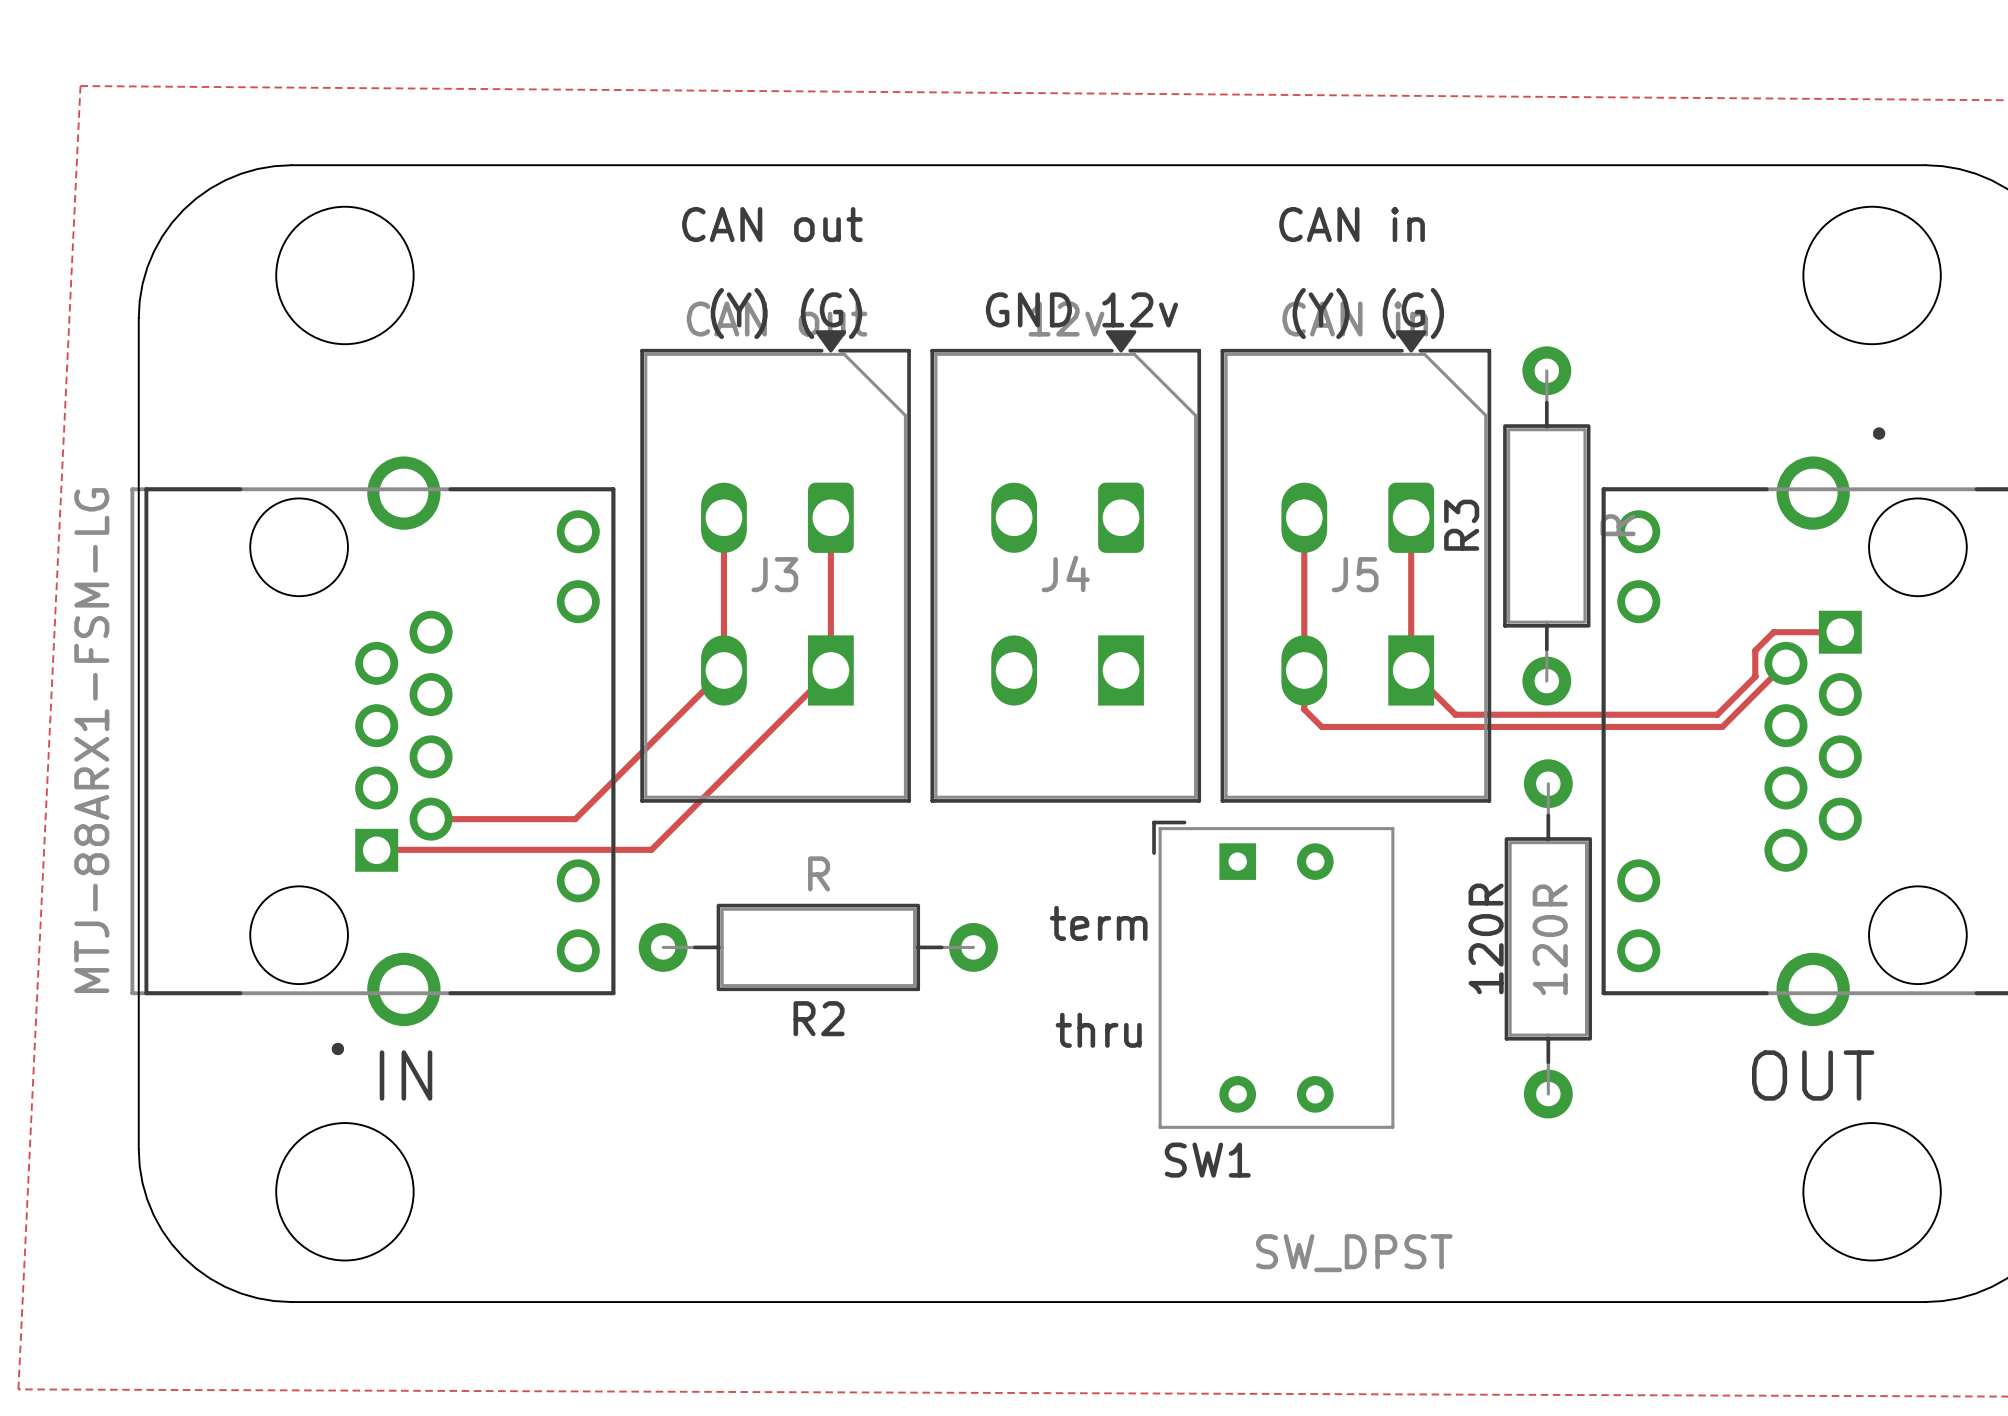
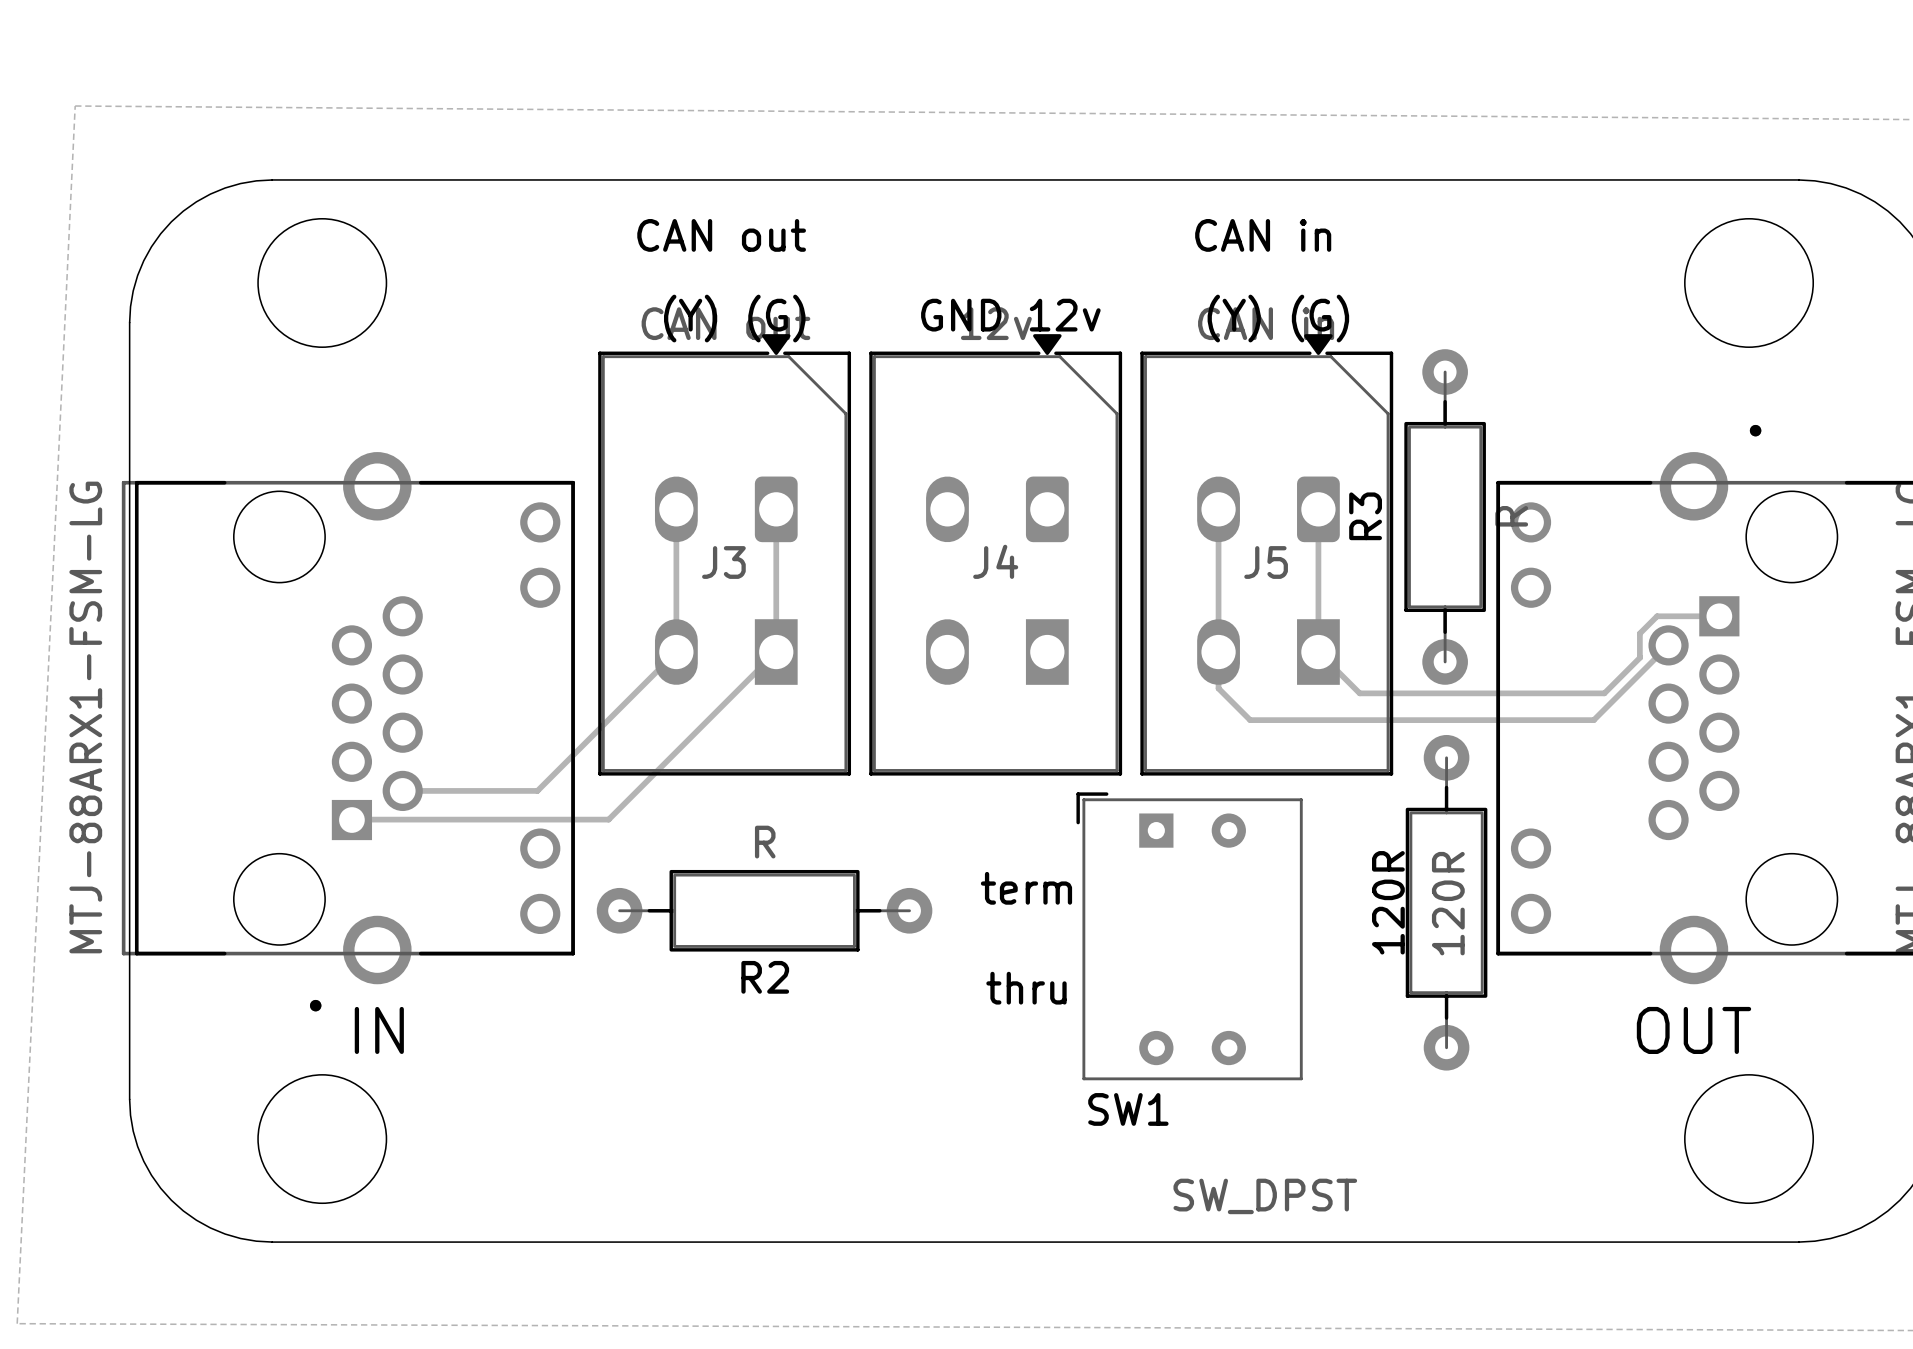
track: (1321, 726) (1722, 726) -> (1234, 704) (1250, 720) (1593, 720) (1609, 704)

